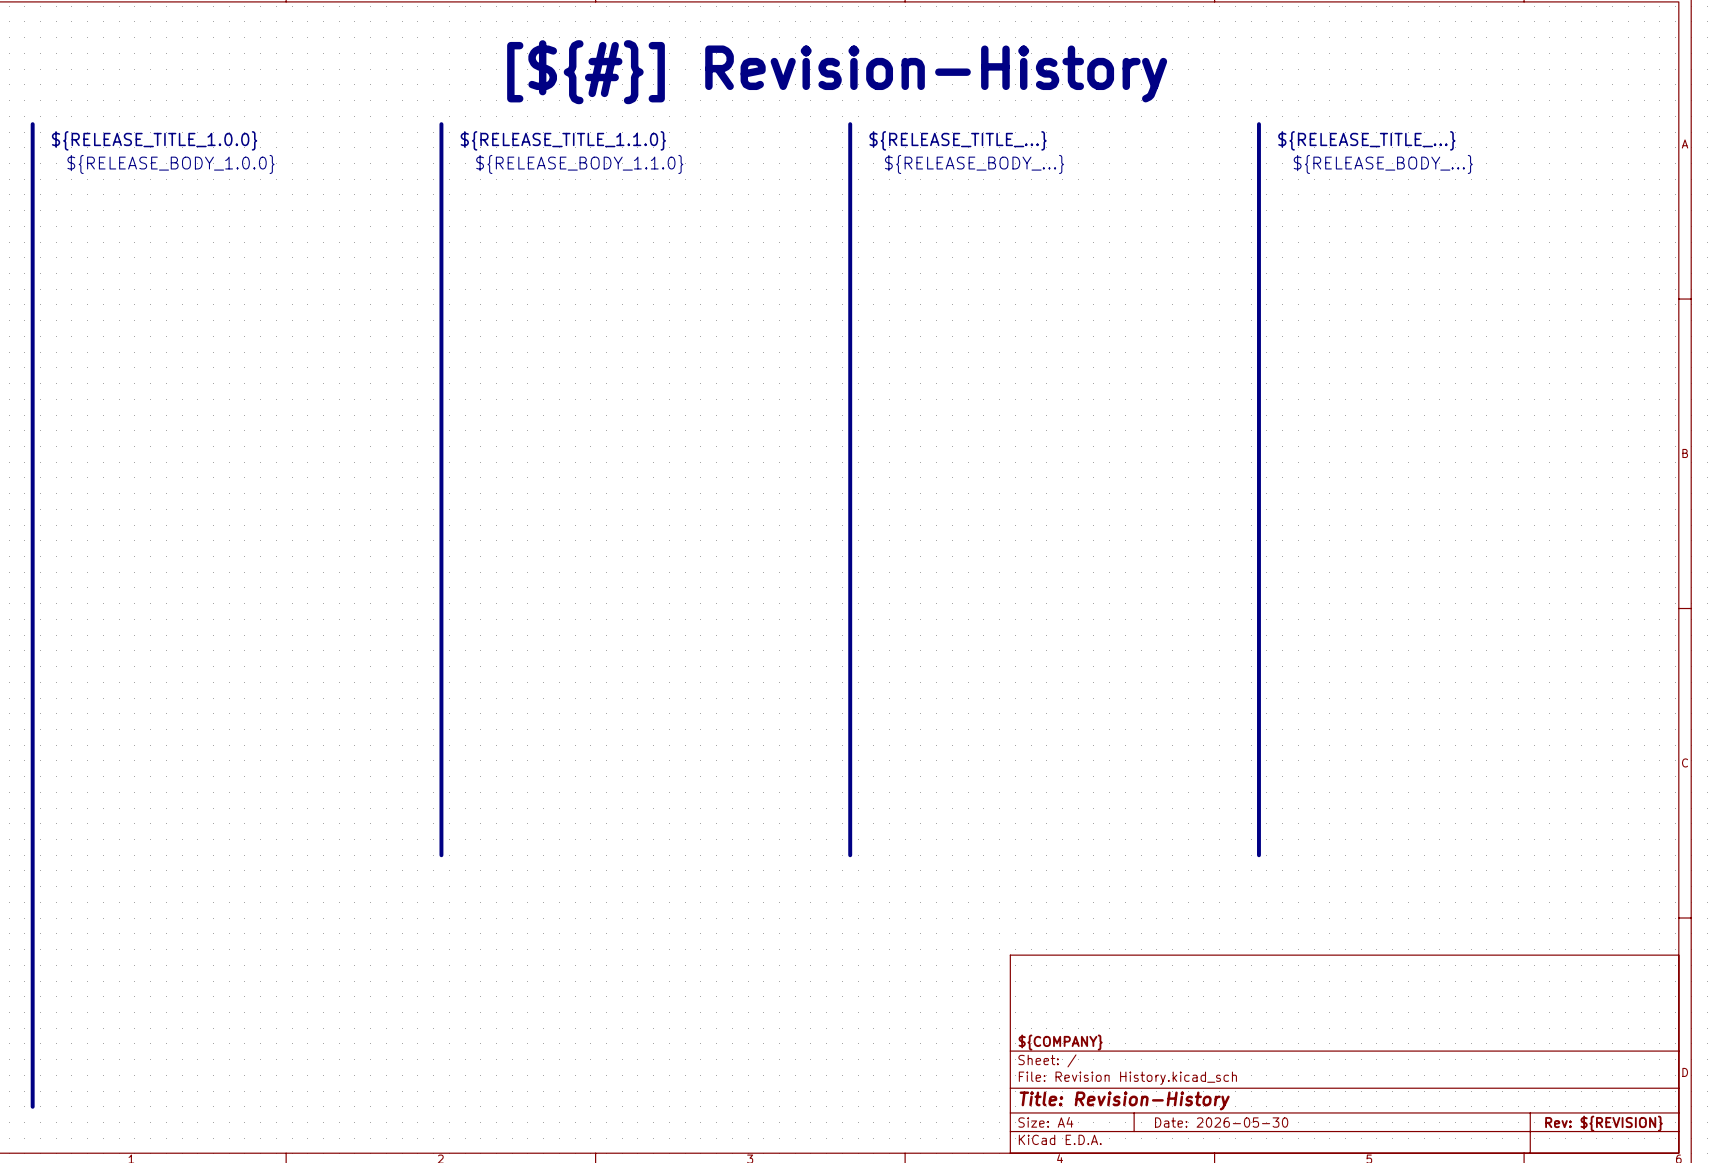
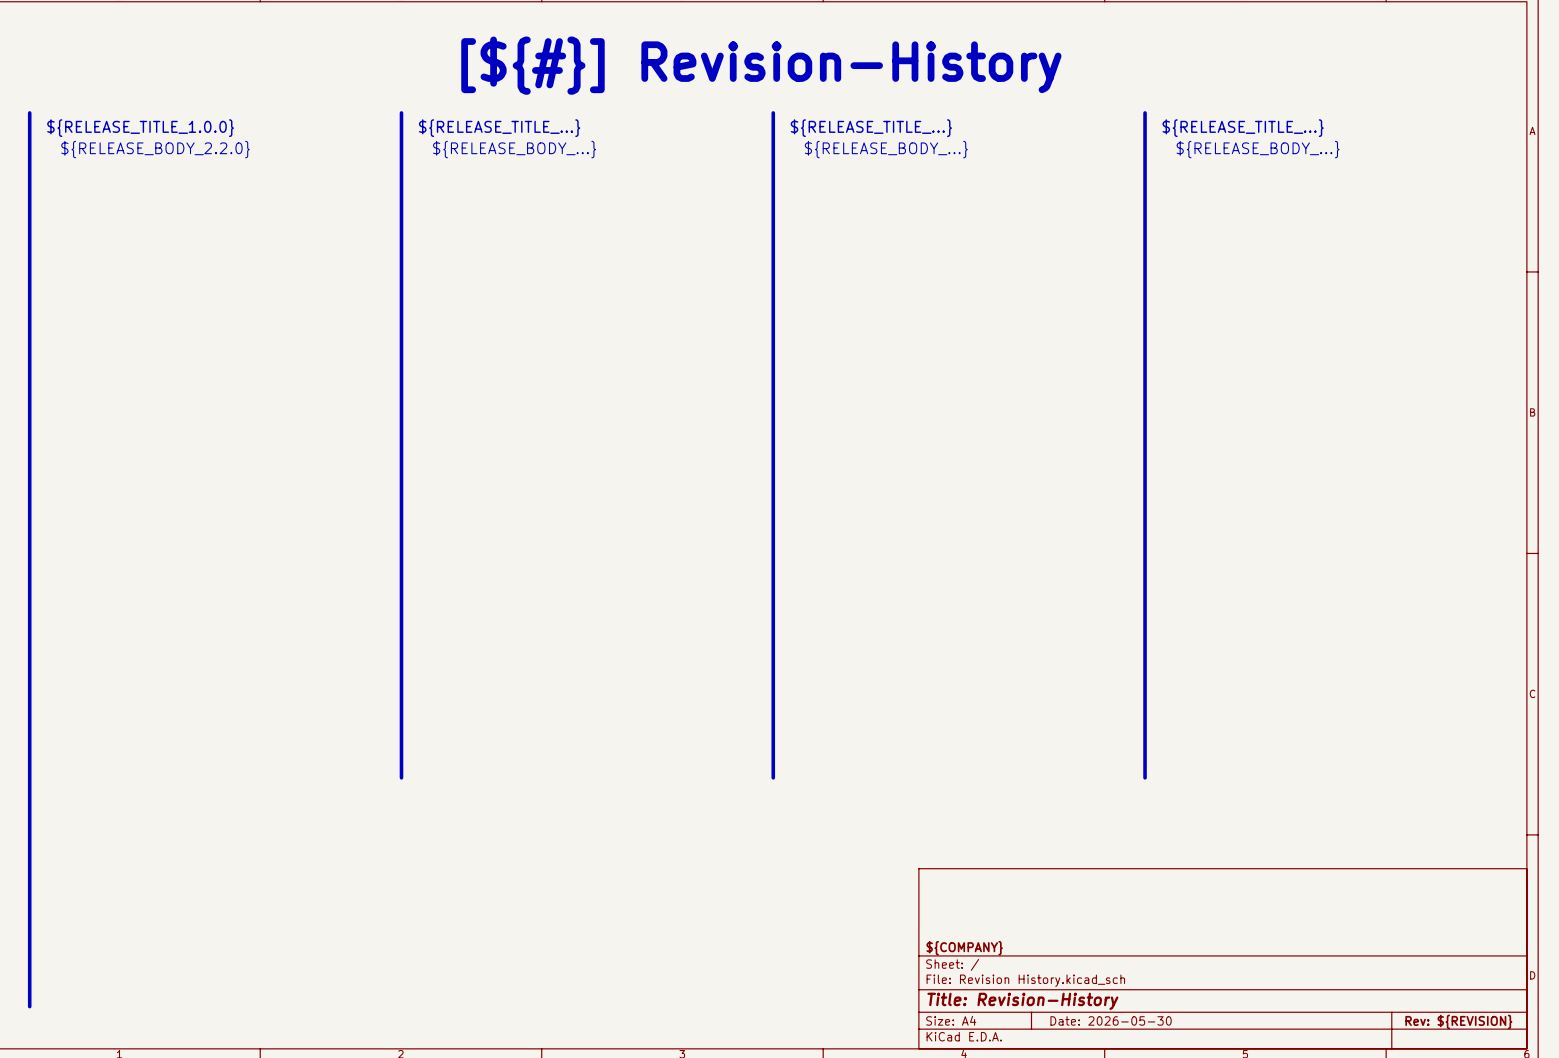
text: ${RELEASE_TITLE_1.1.0} (563, 140) -> ${RELEASE_TITLE_...} (499, 128)
text: ${RELEASE_BODY_1.0.0} (171, 164) -> ${RELEASE_BODY_2.2.0} (155, 149)
text: ${RELEASE_BODY_1.1.0} (579, 164) -> ${RELEASE_BODY_...} (514, 149)

